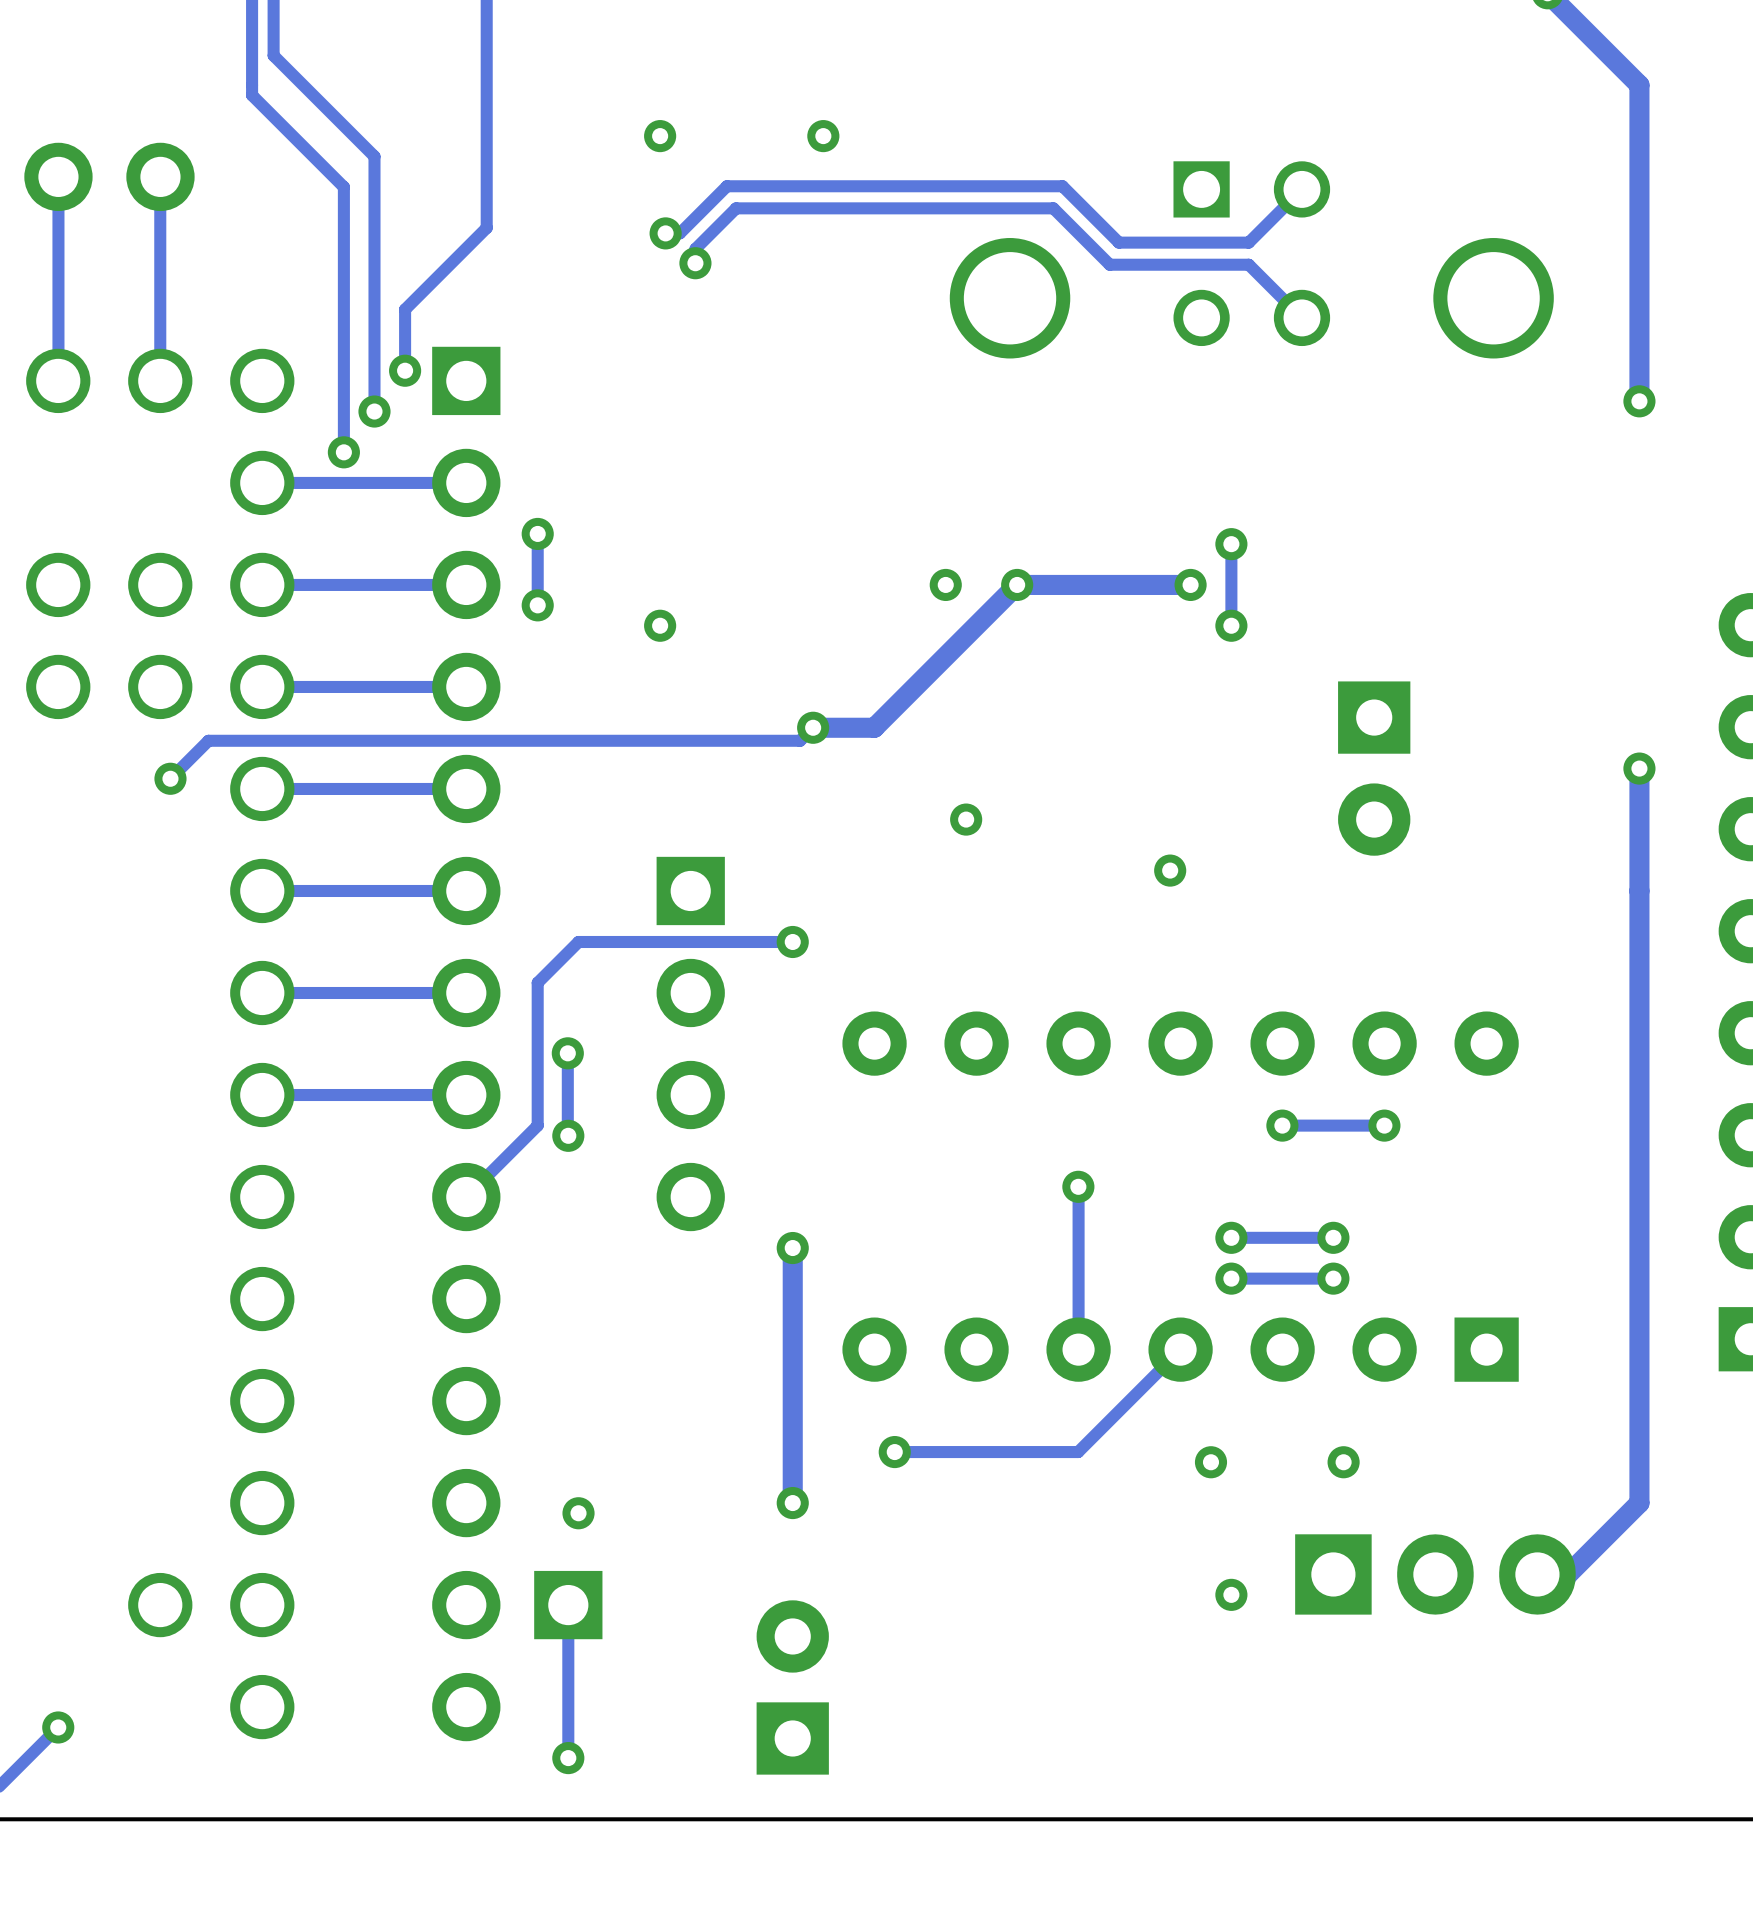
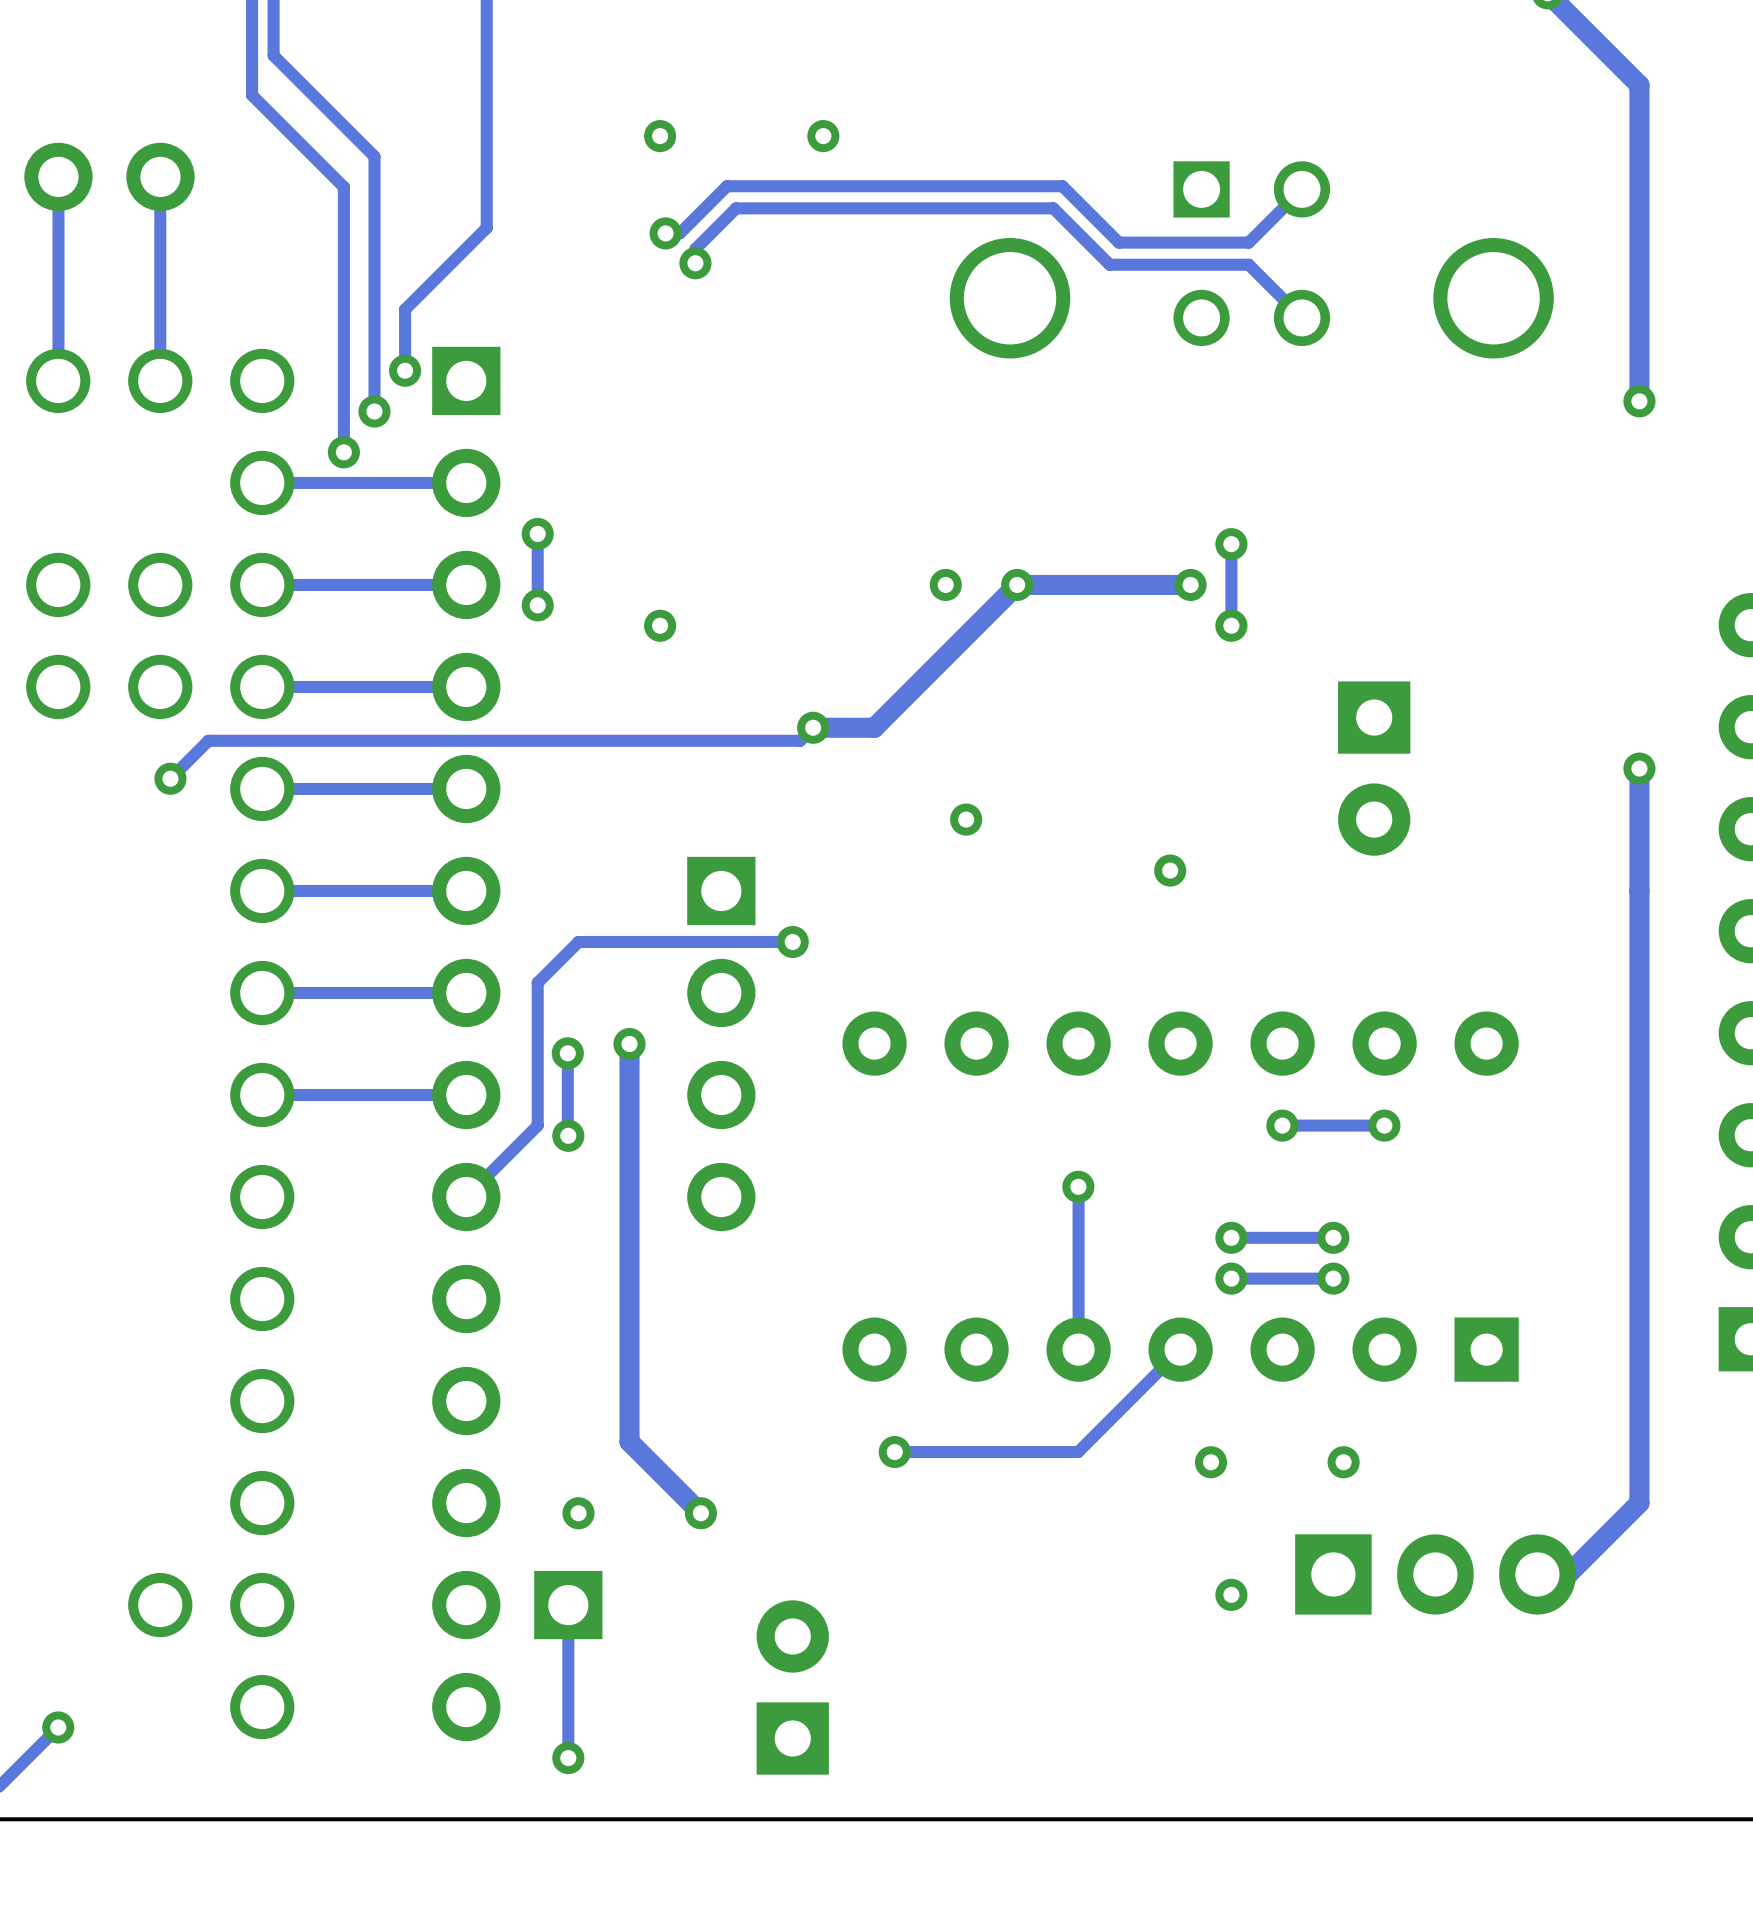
track: none -> (629, 1044) (629, 1441) (700, 1513)
via: none -> (629, 1044)
part position: (690, 1044) -> (721, 1044)
track: (792, 1248) (792, 1503) -> none
via: (792, 1248) -> none
via position: (792, 1503) -> (700, 1513)

